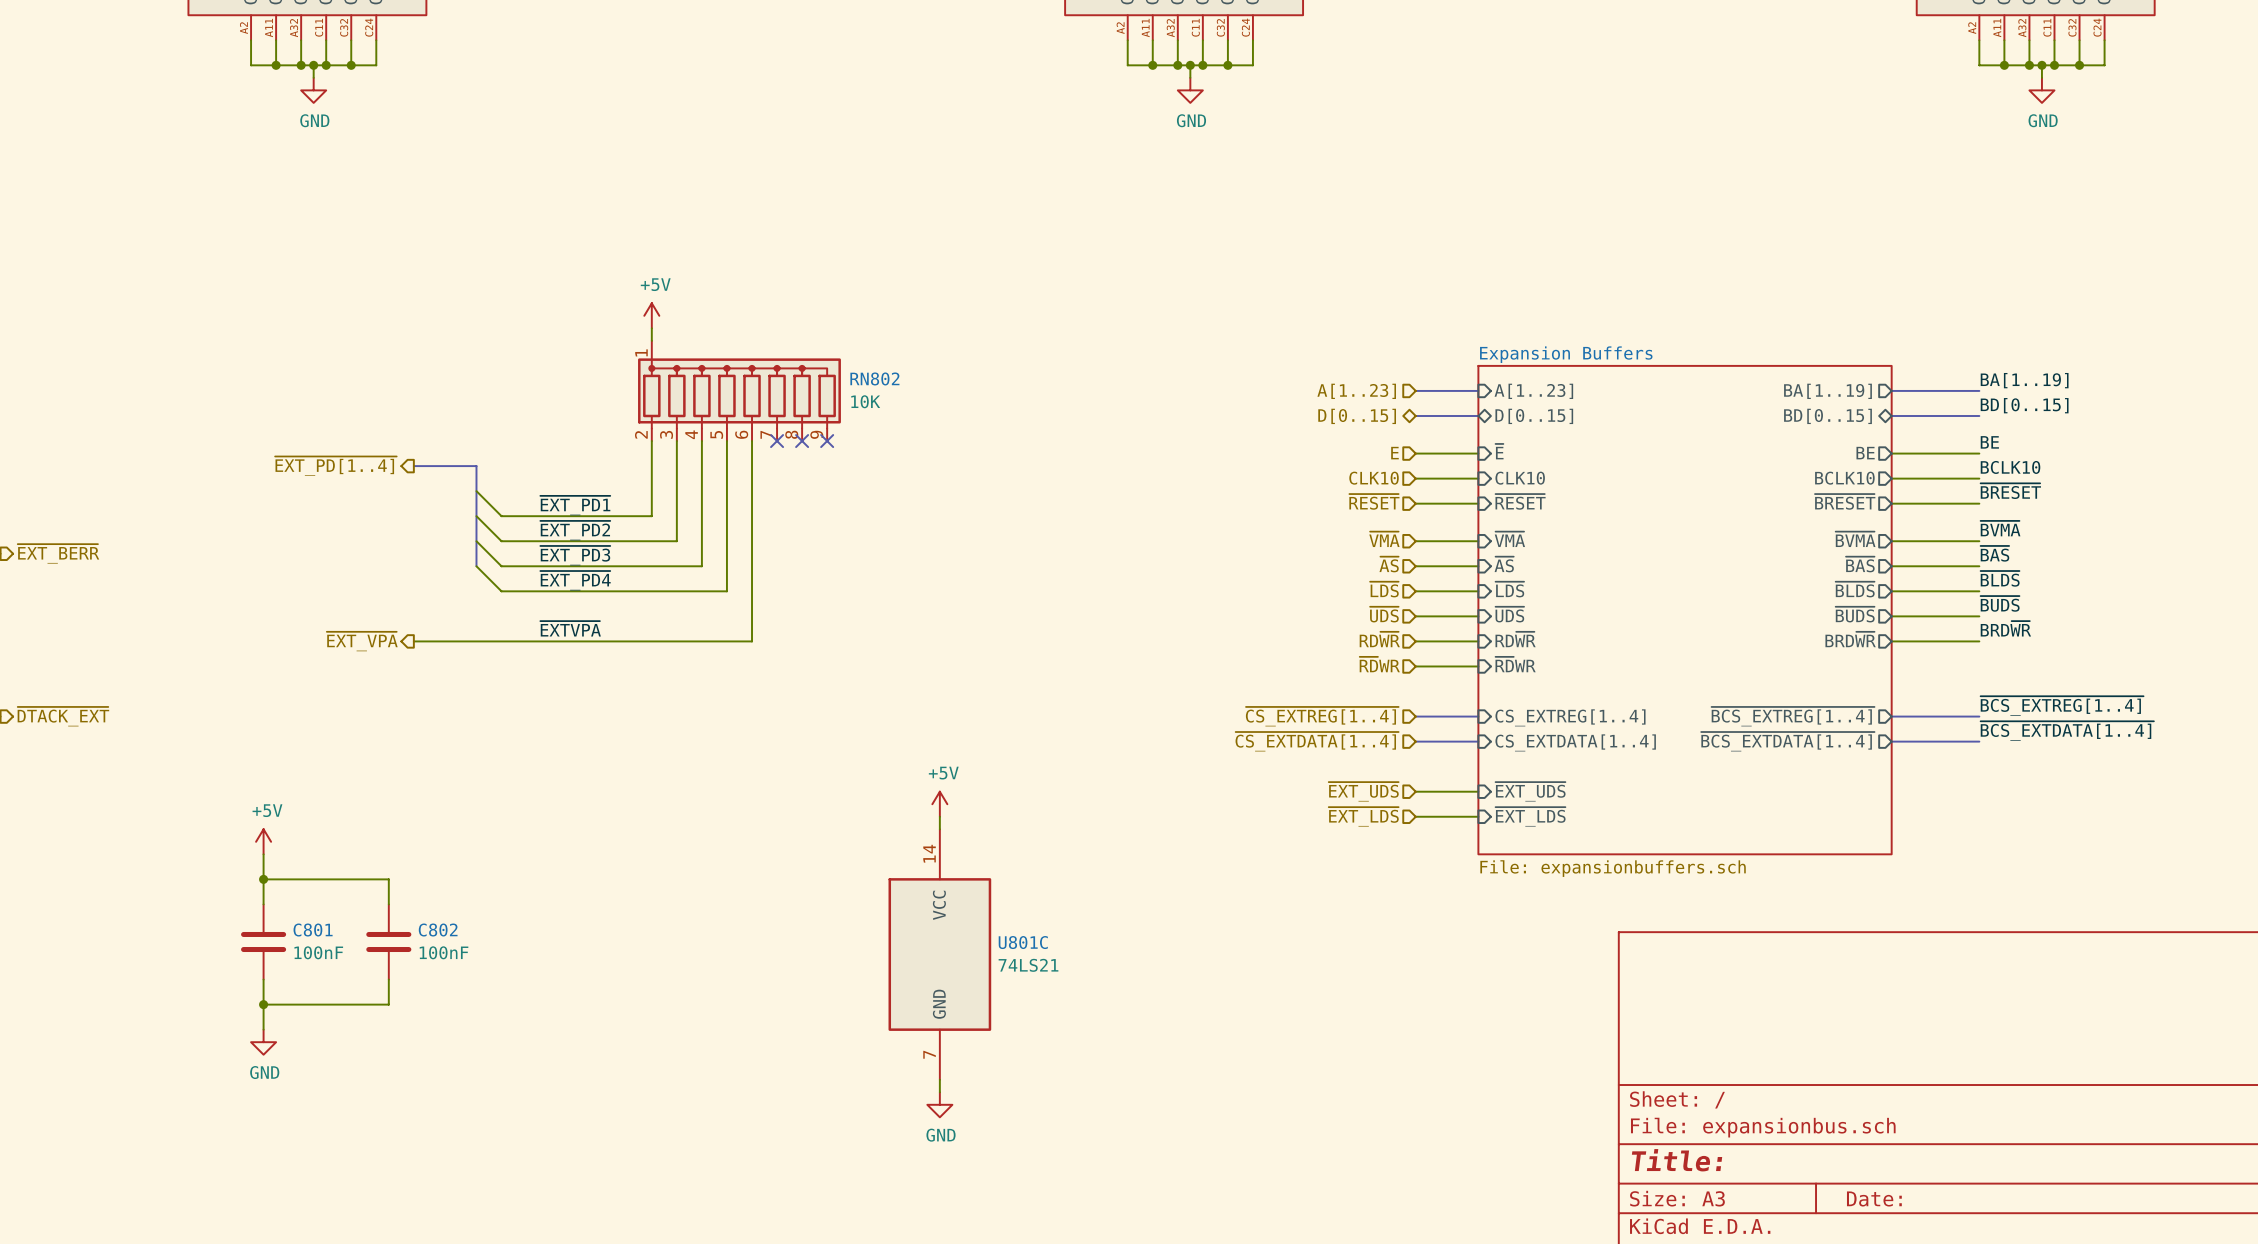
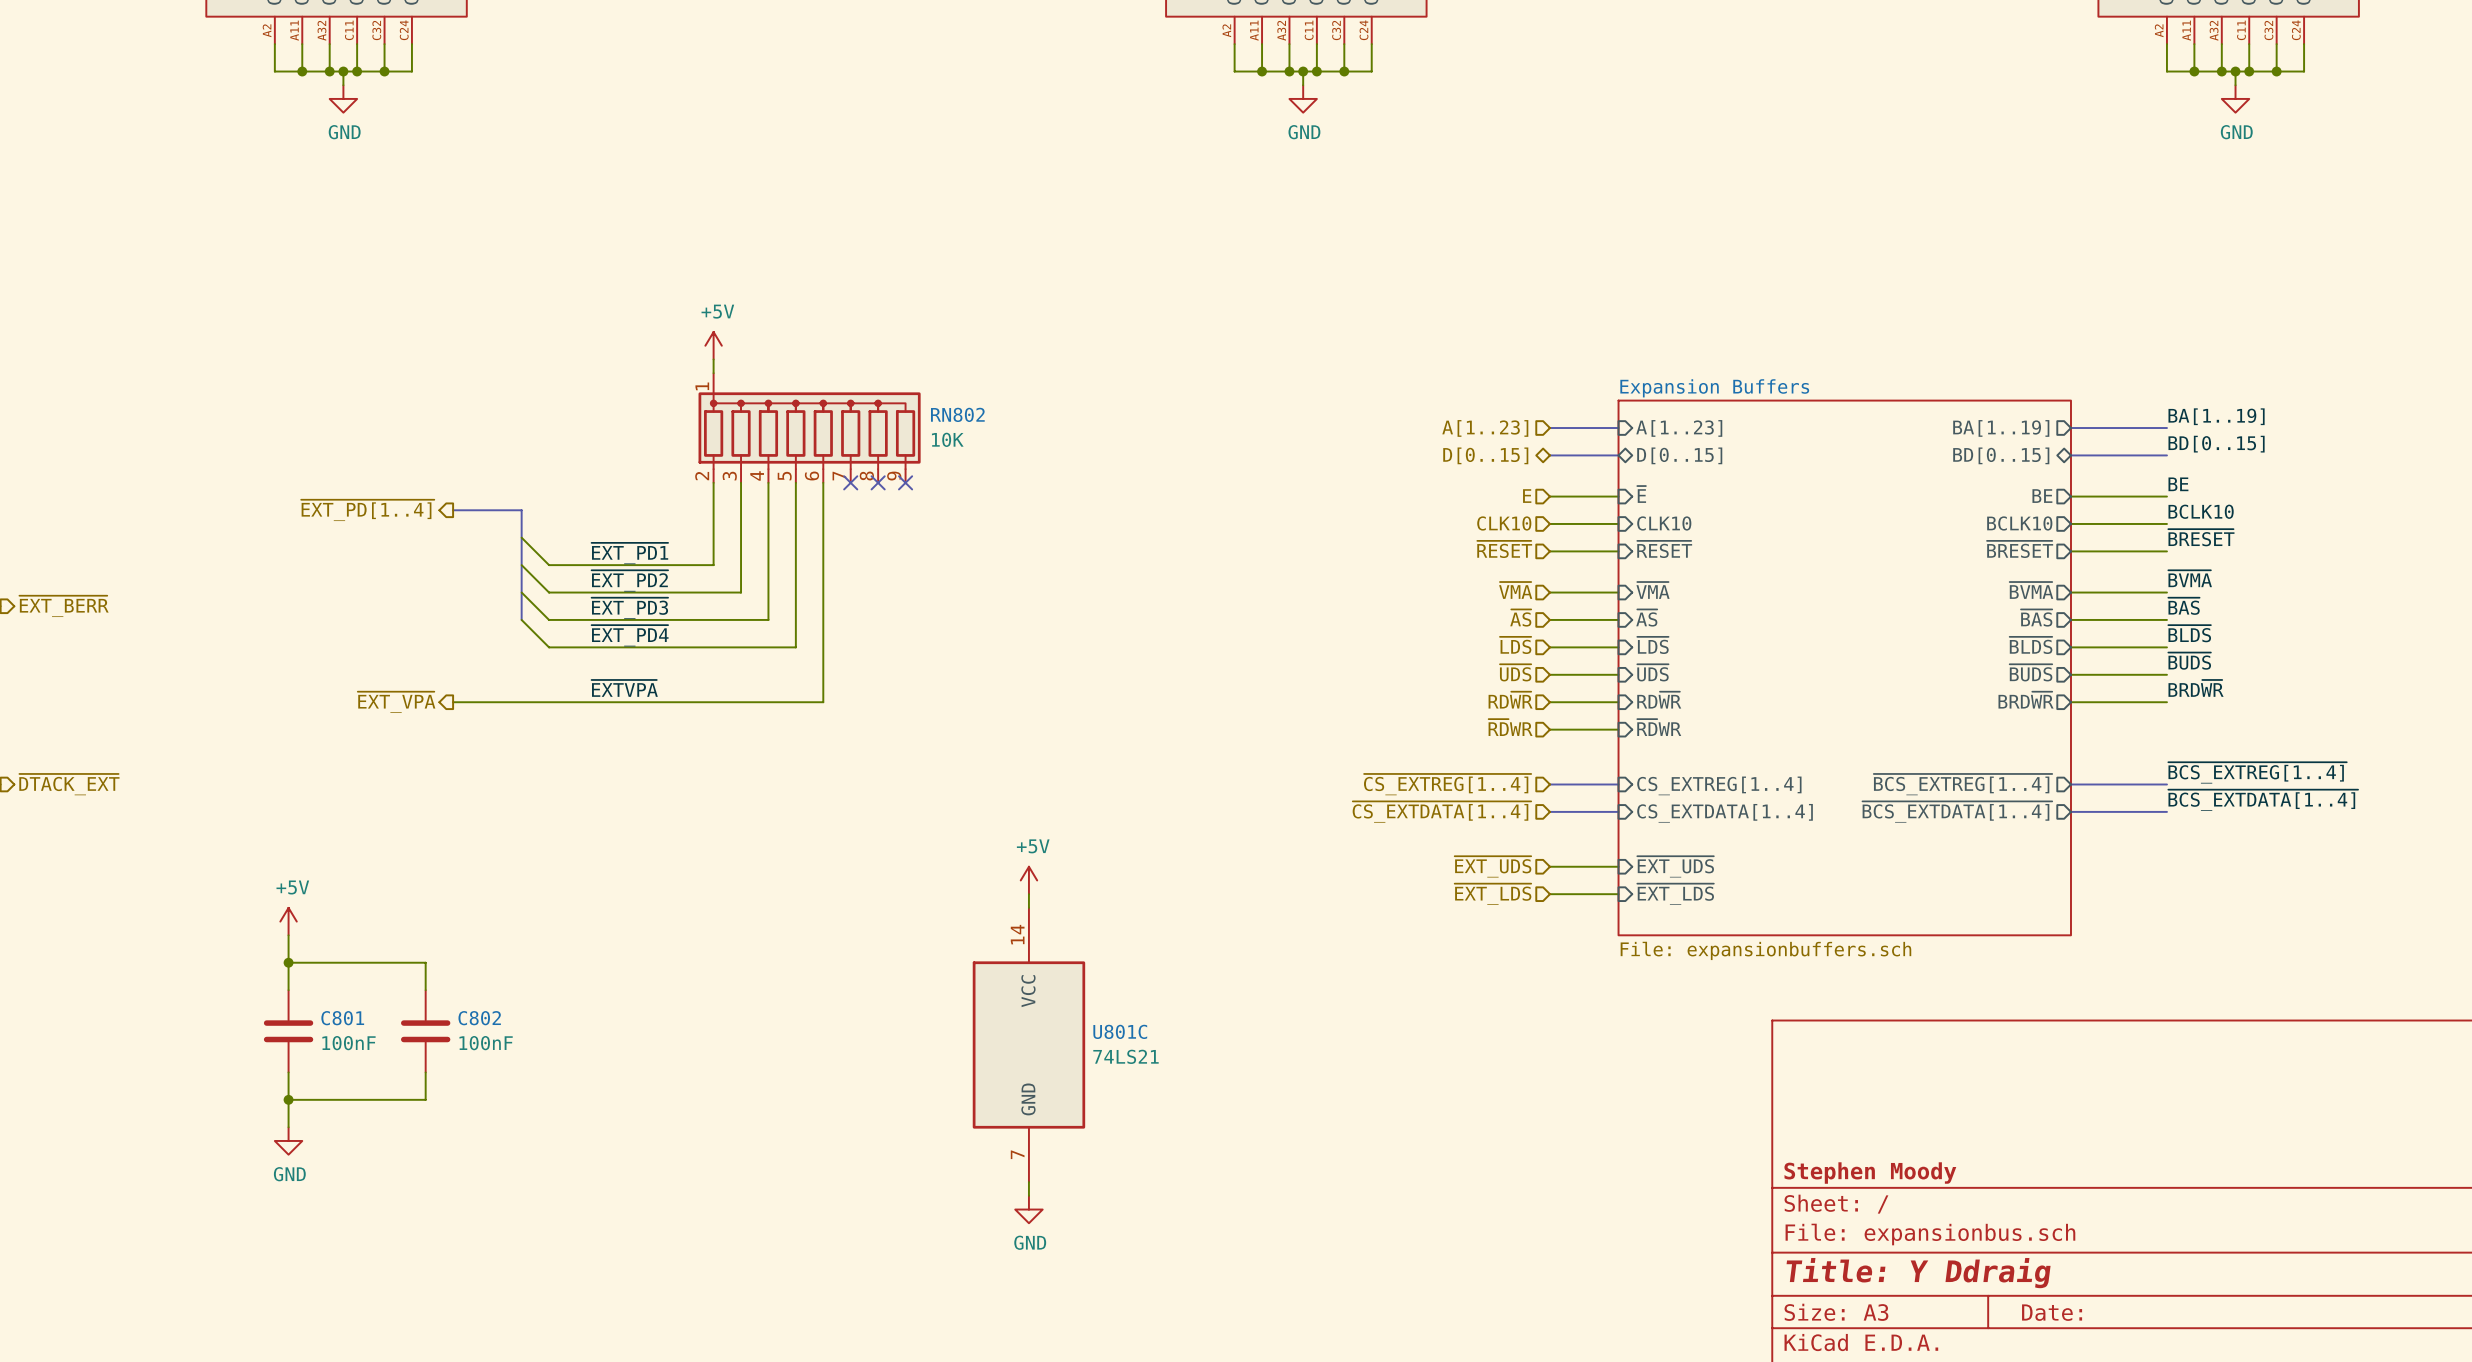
title block: none -> Stephen Moody (1870, 1173)
title block: Title: (1677, 1160) -> Title: Y Ddraig (1918, 1273)

